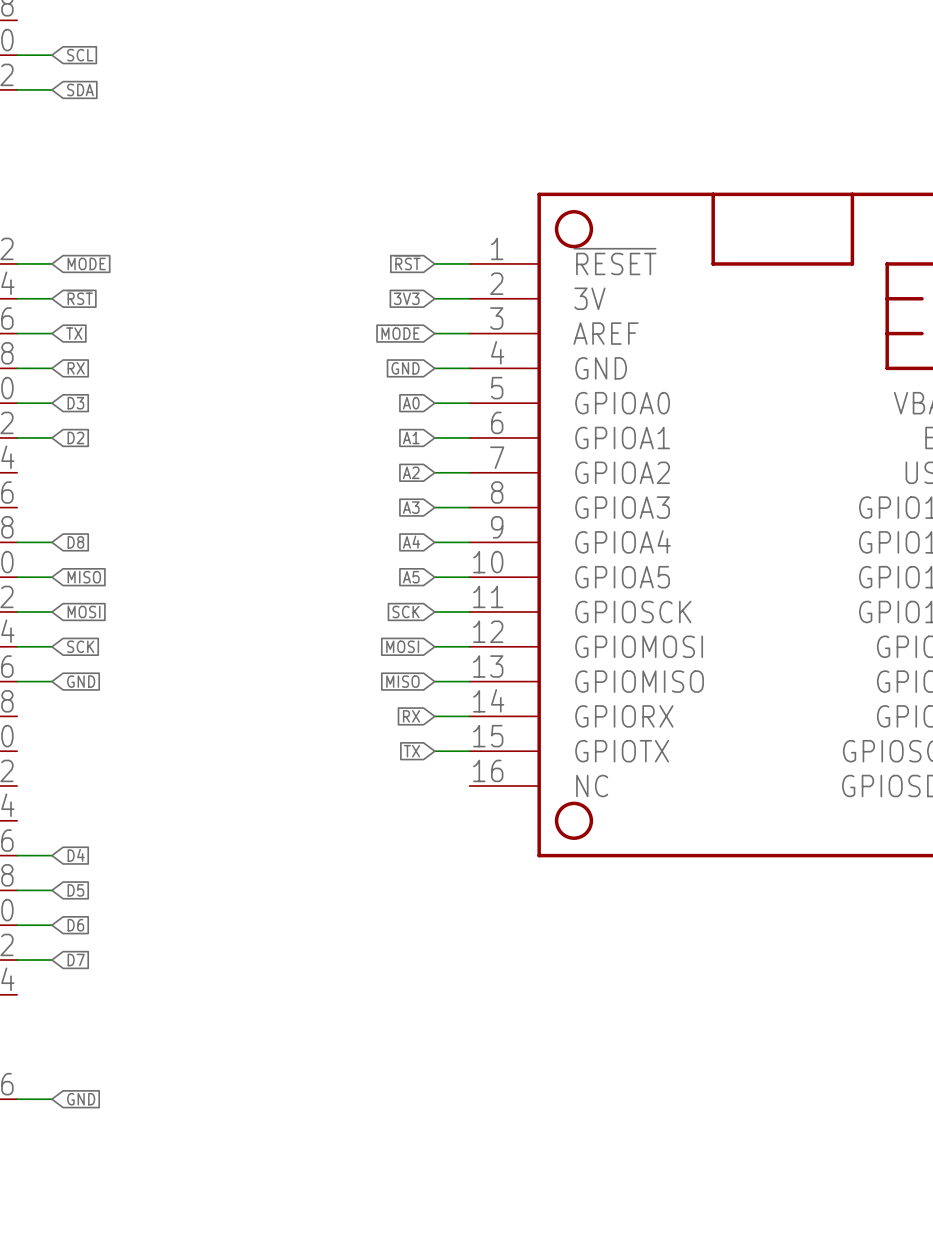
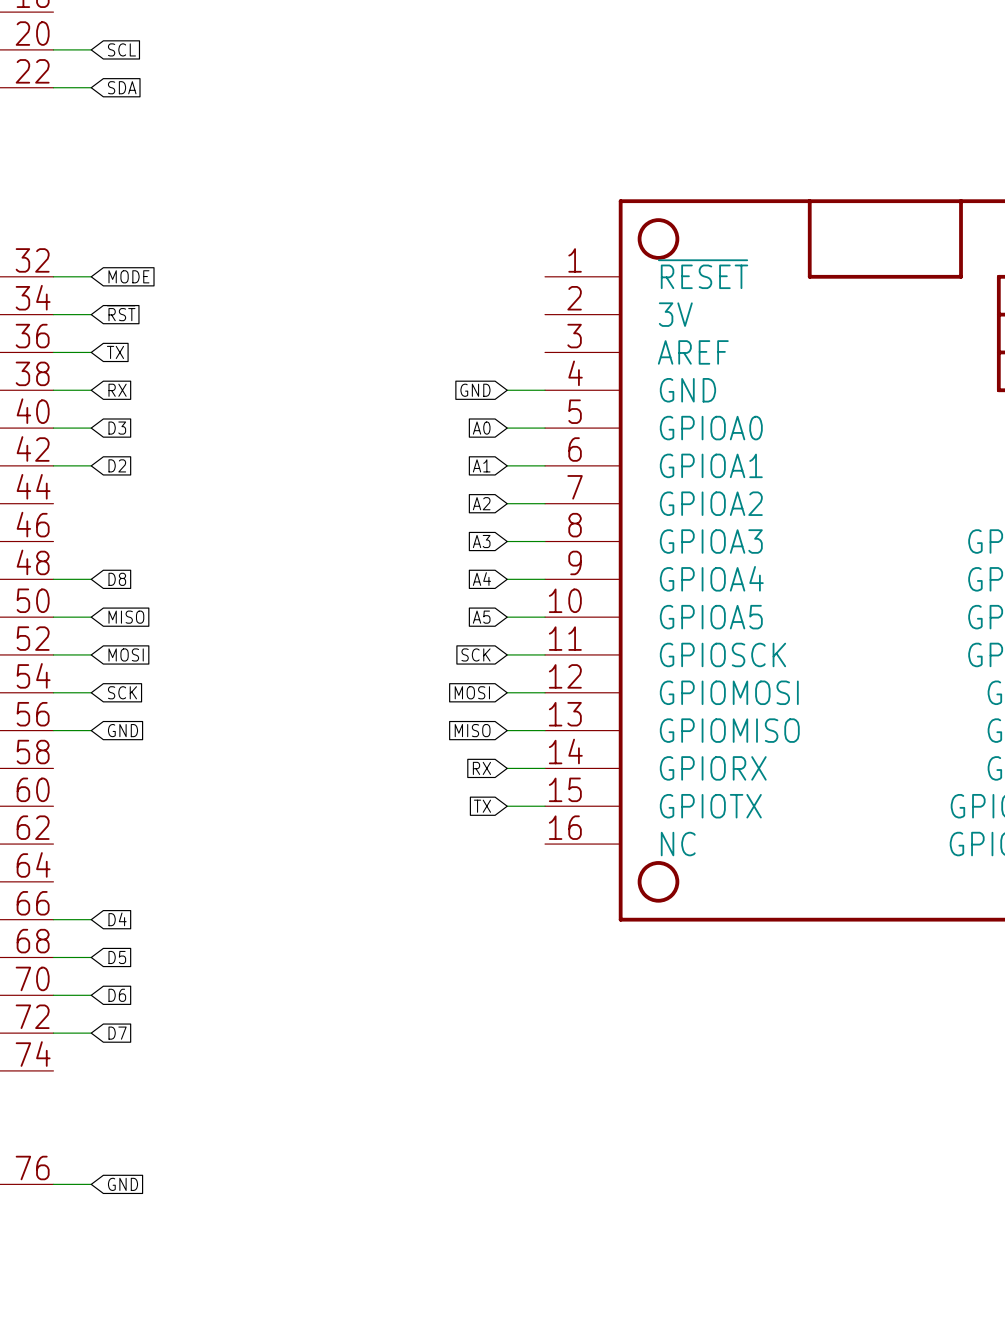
global label: ~{RST} (407, 262) -> none
wire: (434, 263) (469, 263) -> none
global label: 3V3 (406, 298) -> none
wire: (434, 298) (469, 298) -> none
global label: MODE (400, 333) -> none
wire: (434, 333) (469, 333) -> none

